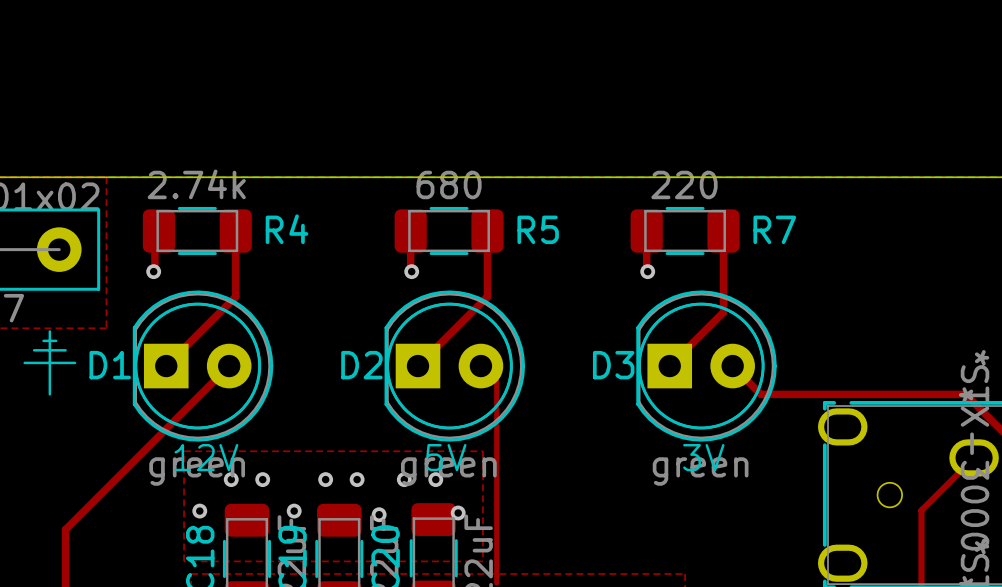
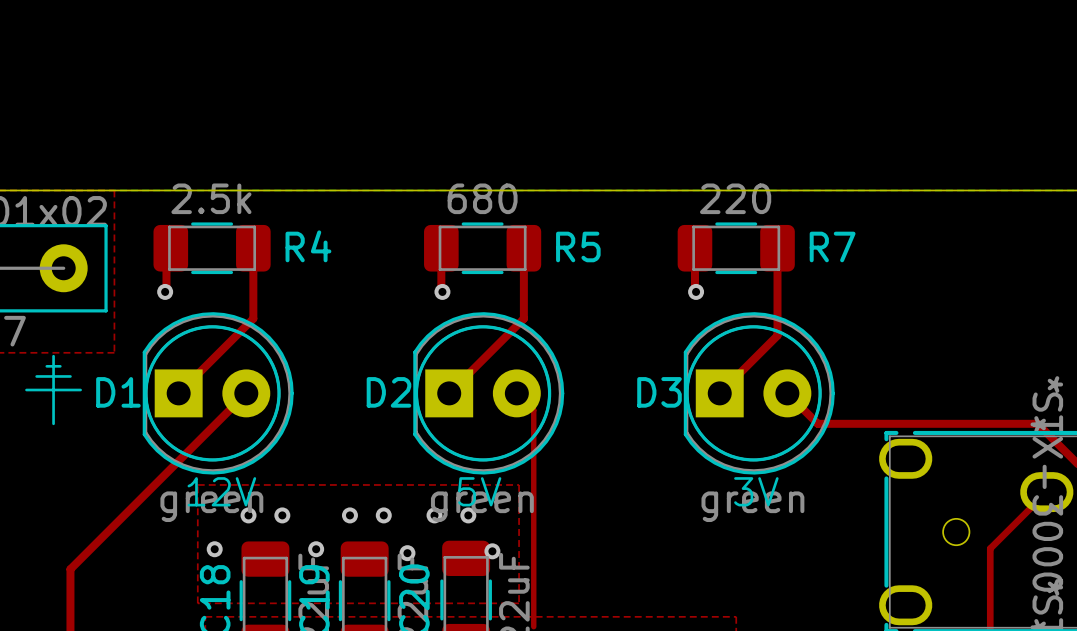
R4 value: 2.74k (196, 184) -> 2.5k (211, 198)

